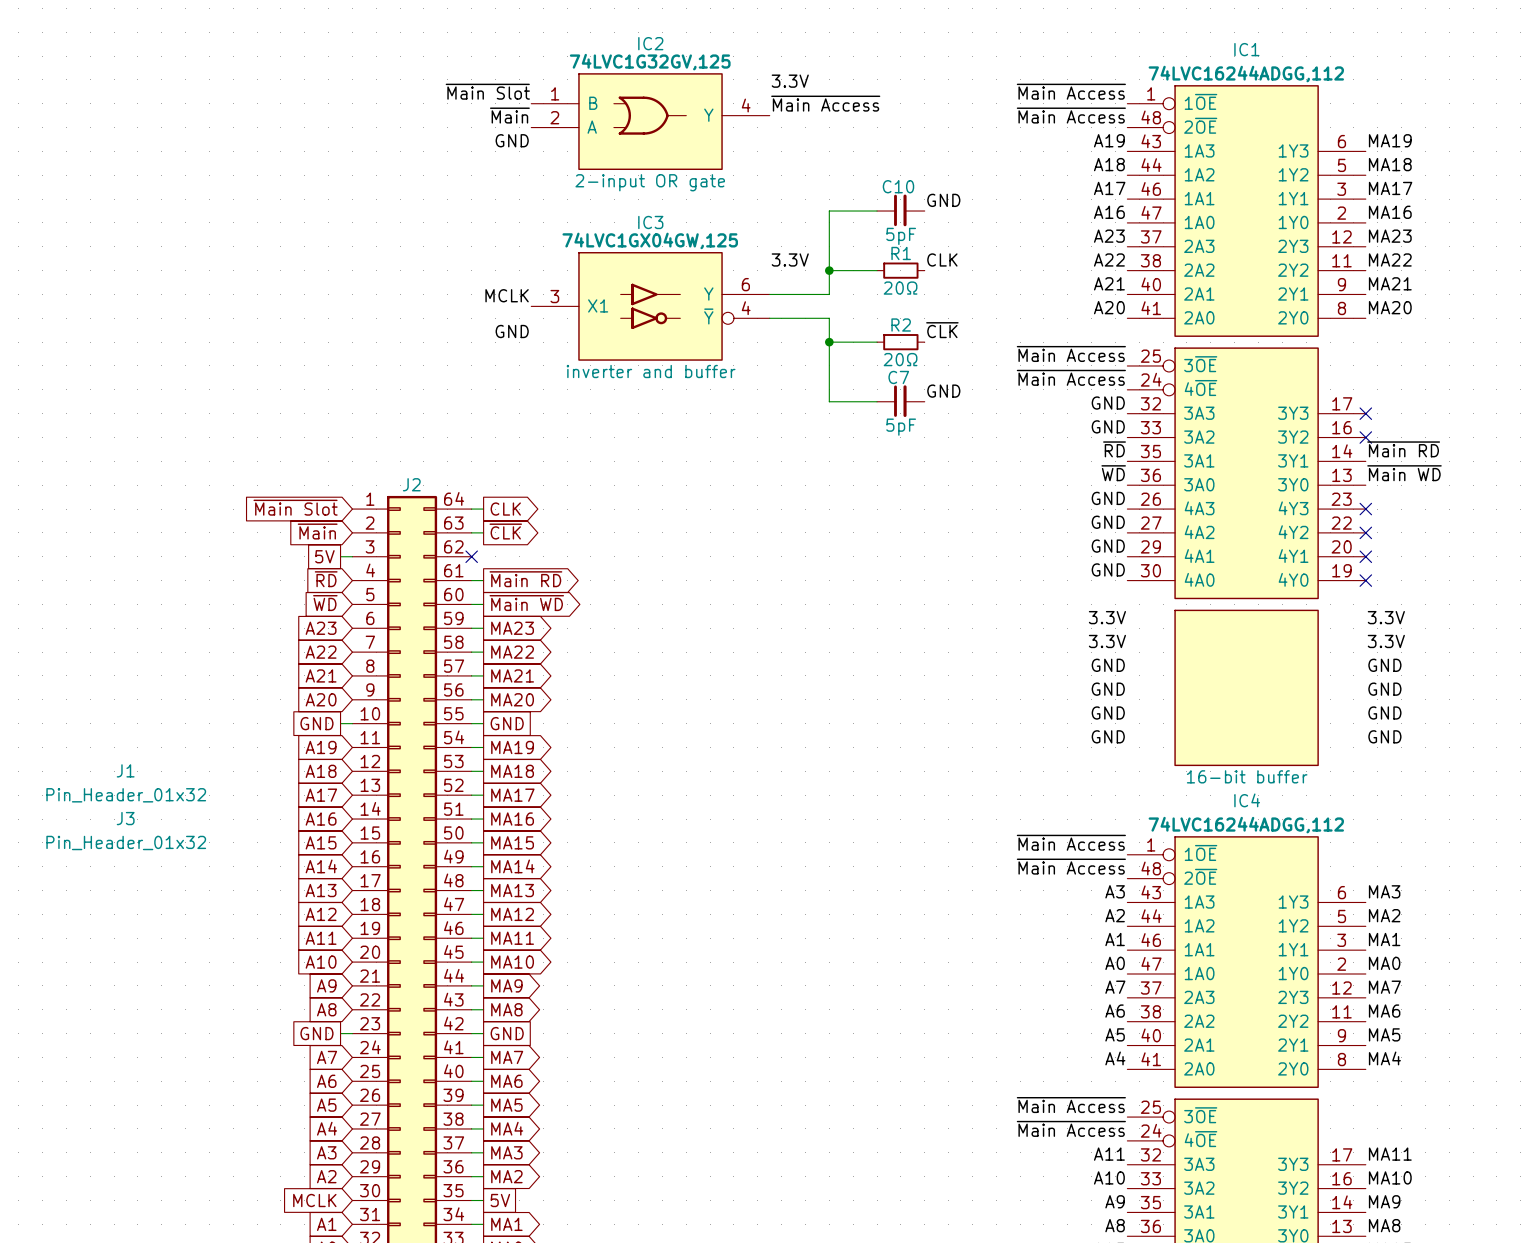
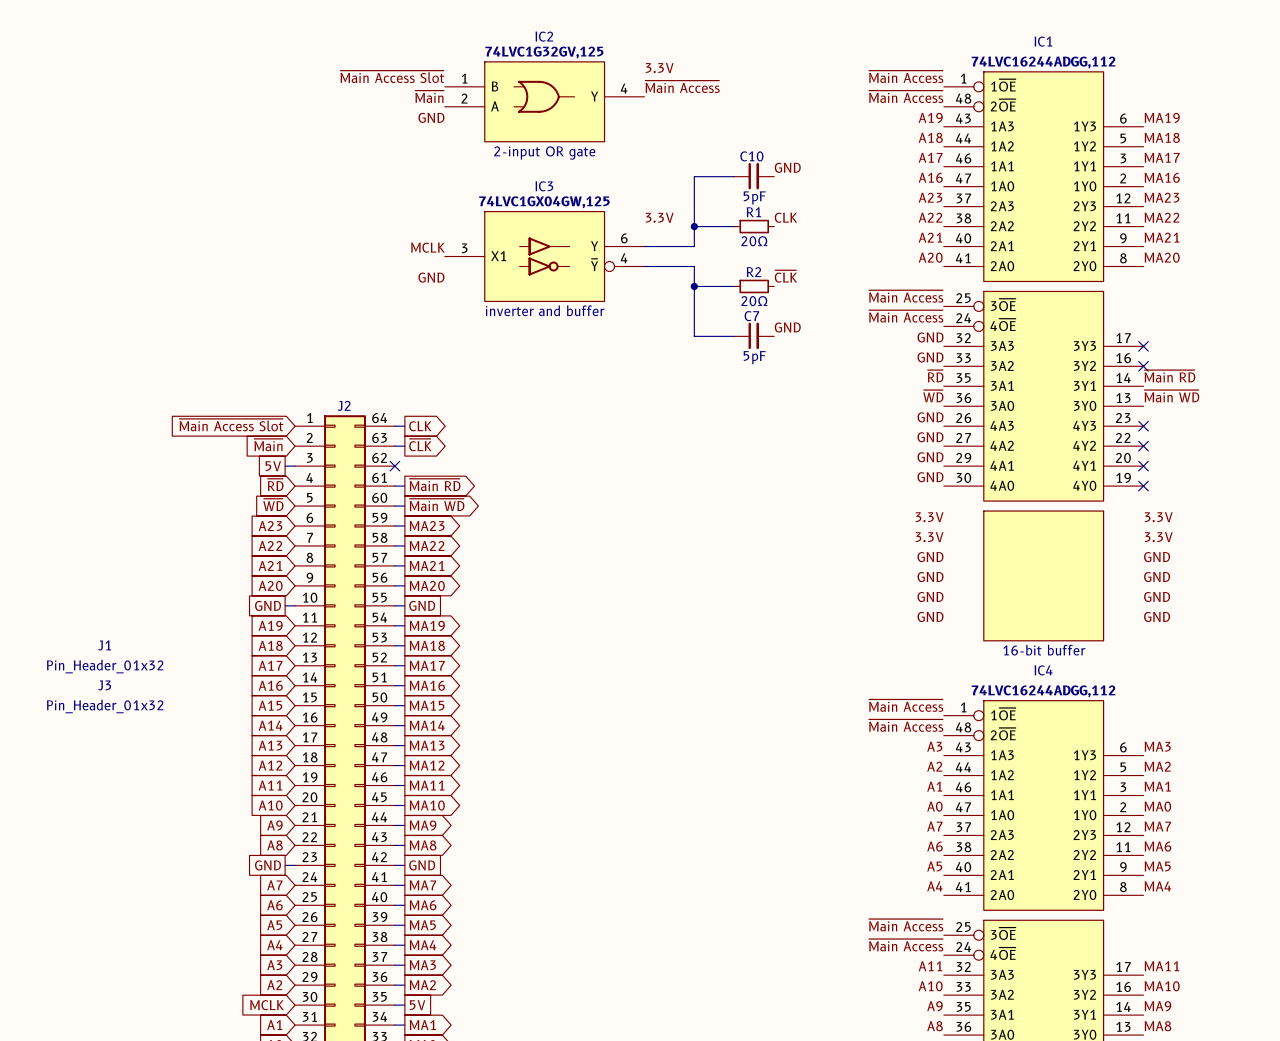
label: ~{Main Slot} (487, 91) -> ~{Main Access Slot} (392, 76)
global label: ~{Main Slot} (295, 507) -> ~{Main Access Slot} (231, 425)

